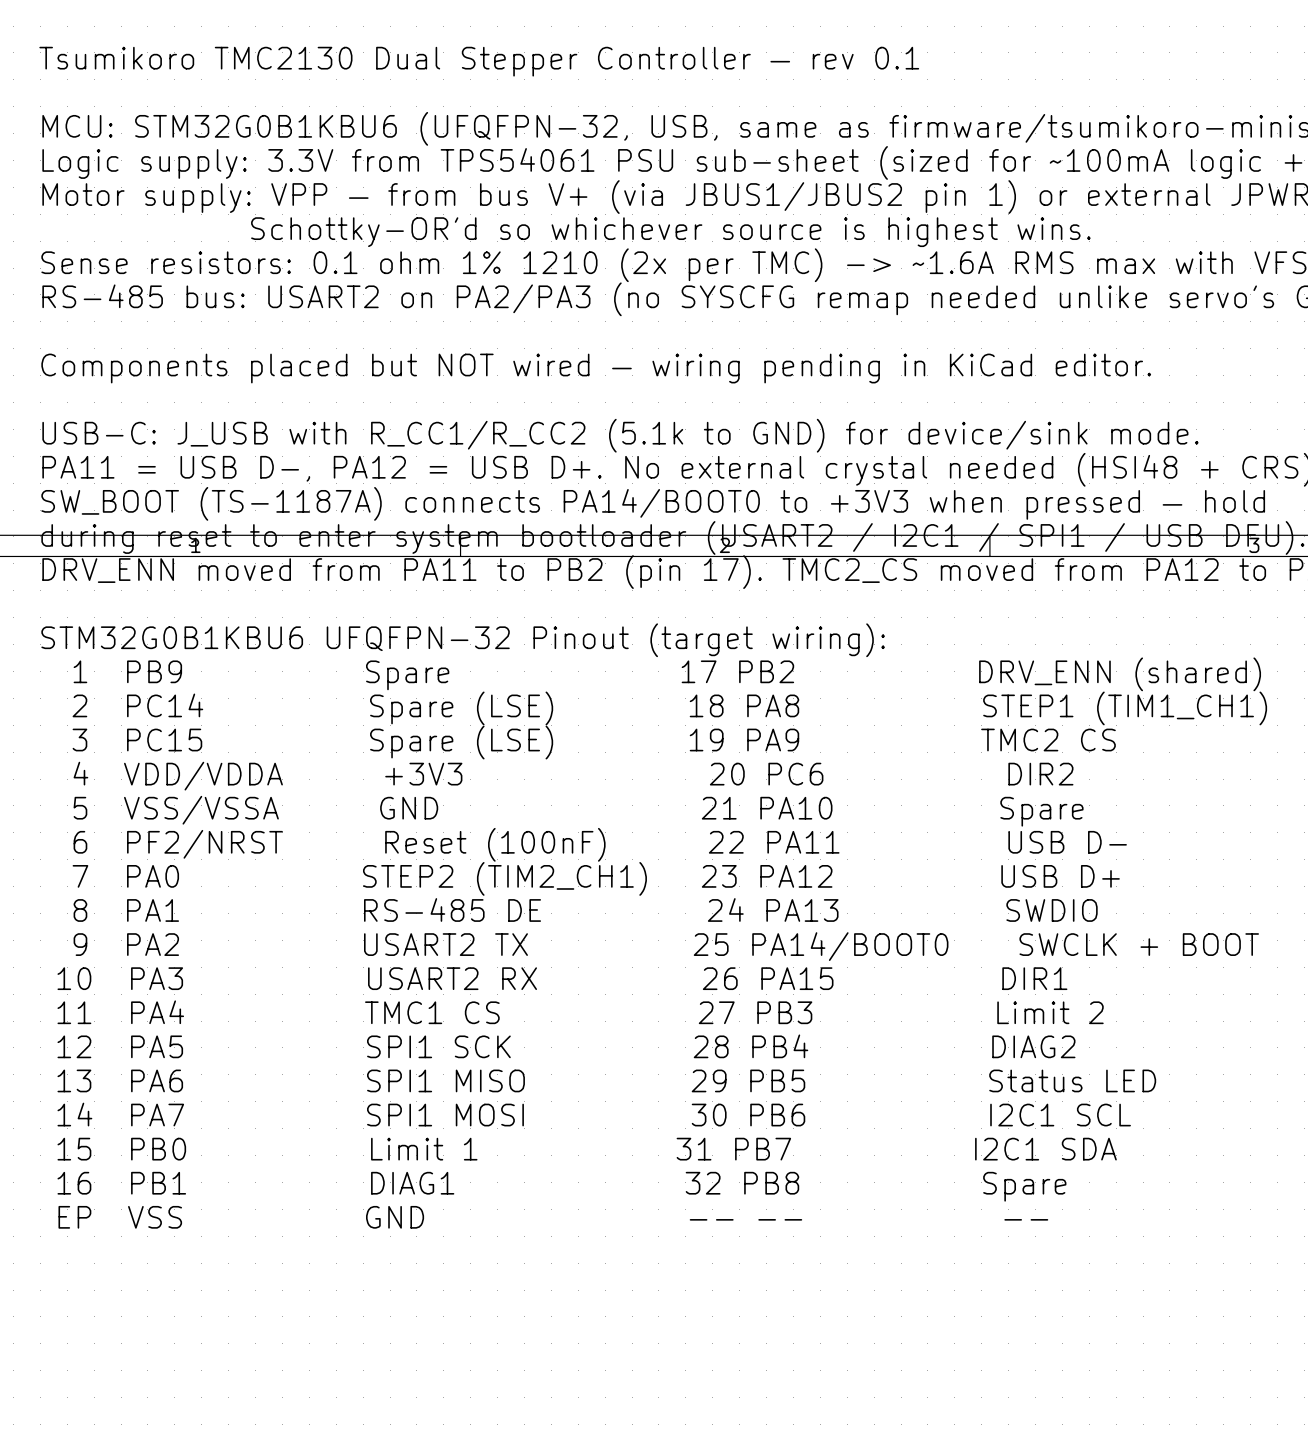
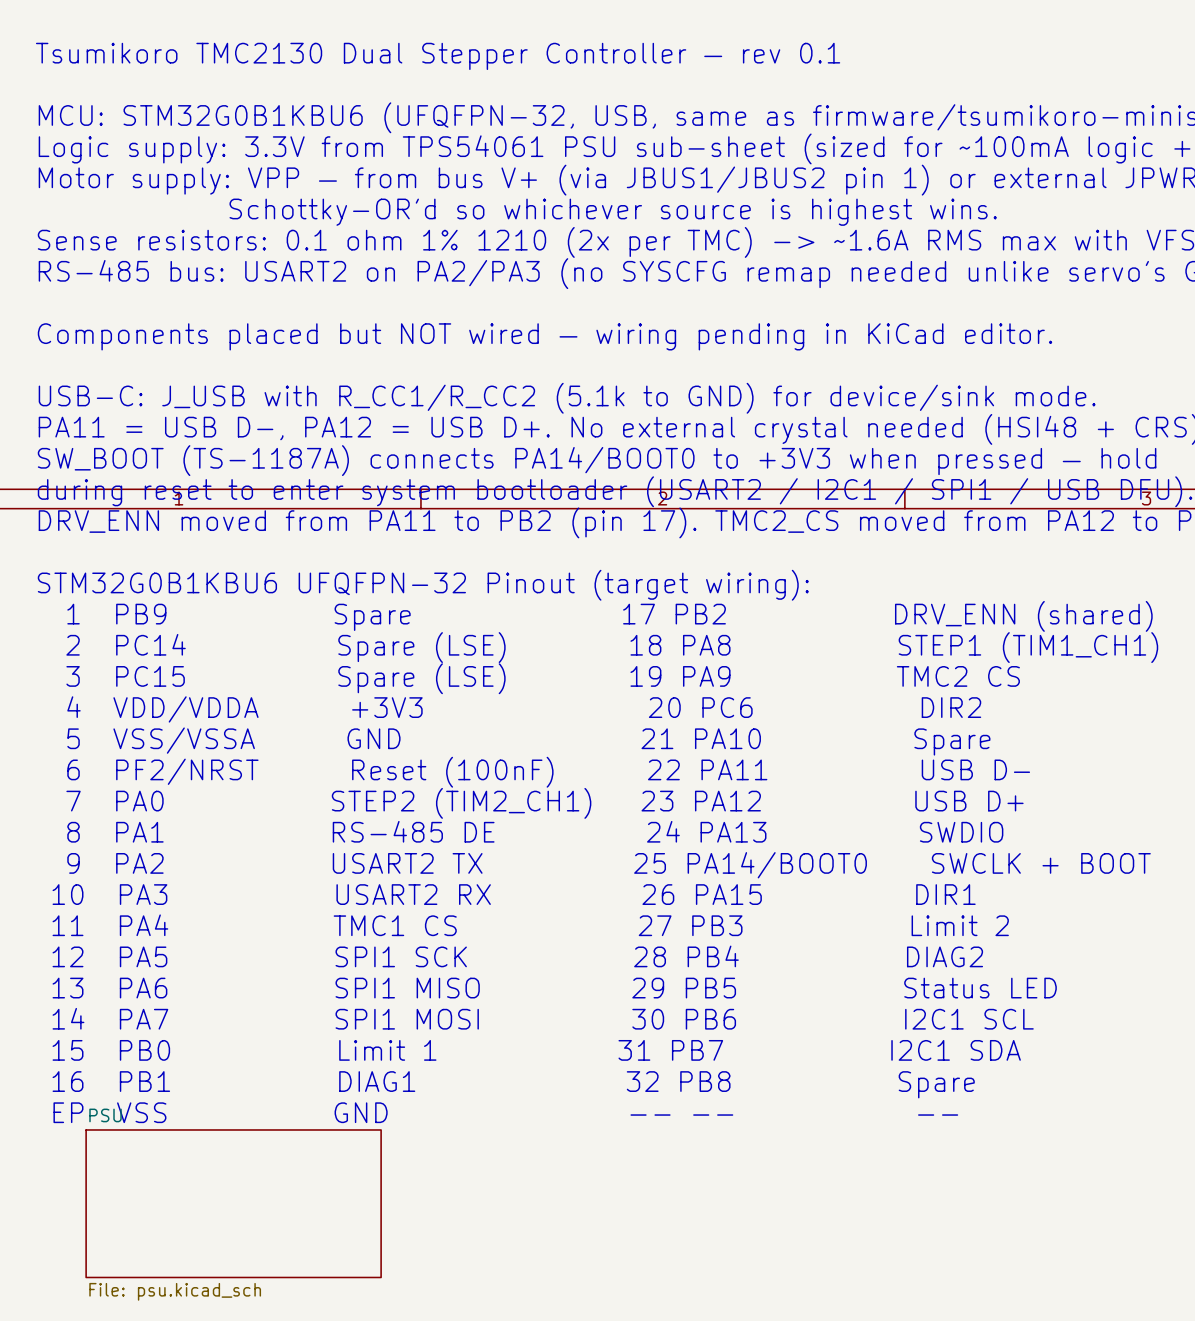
sheet PSU: none -> File: psu.kicad_sch (233, 1203)

